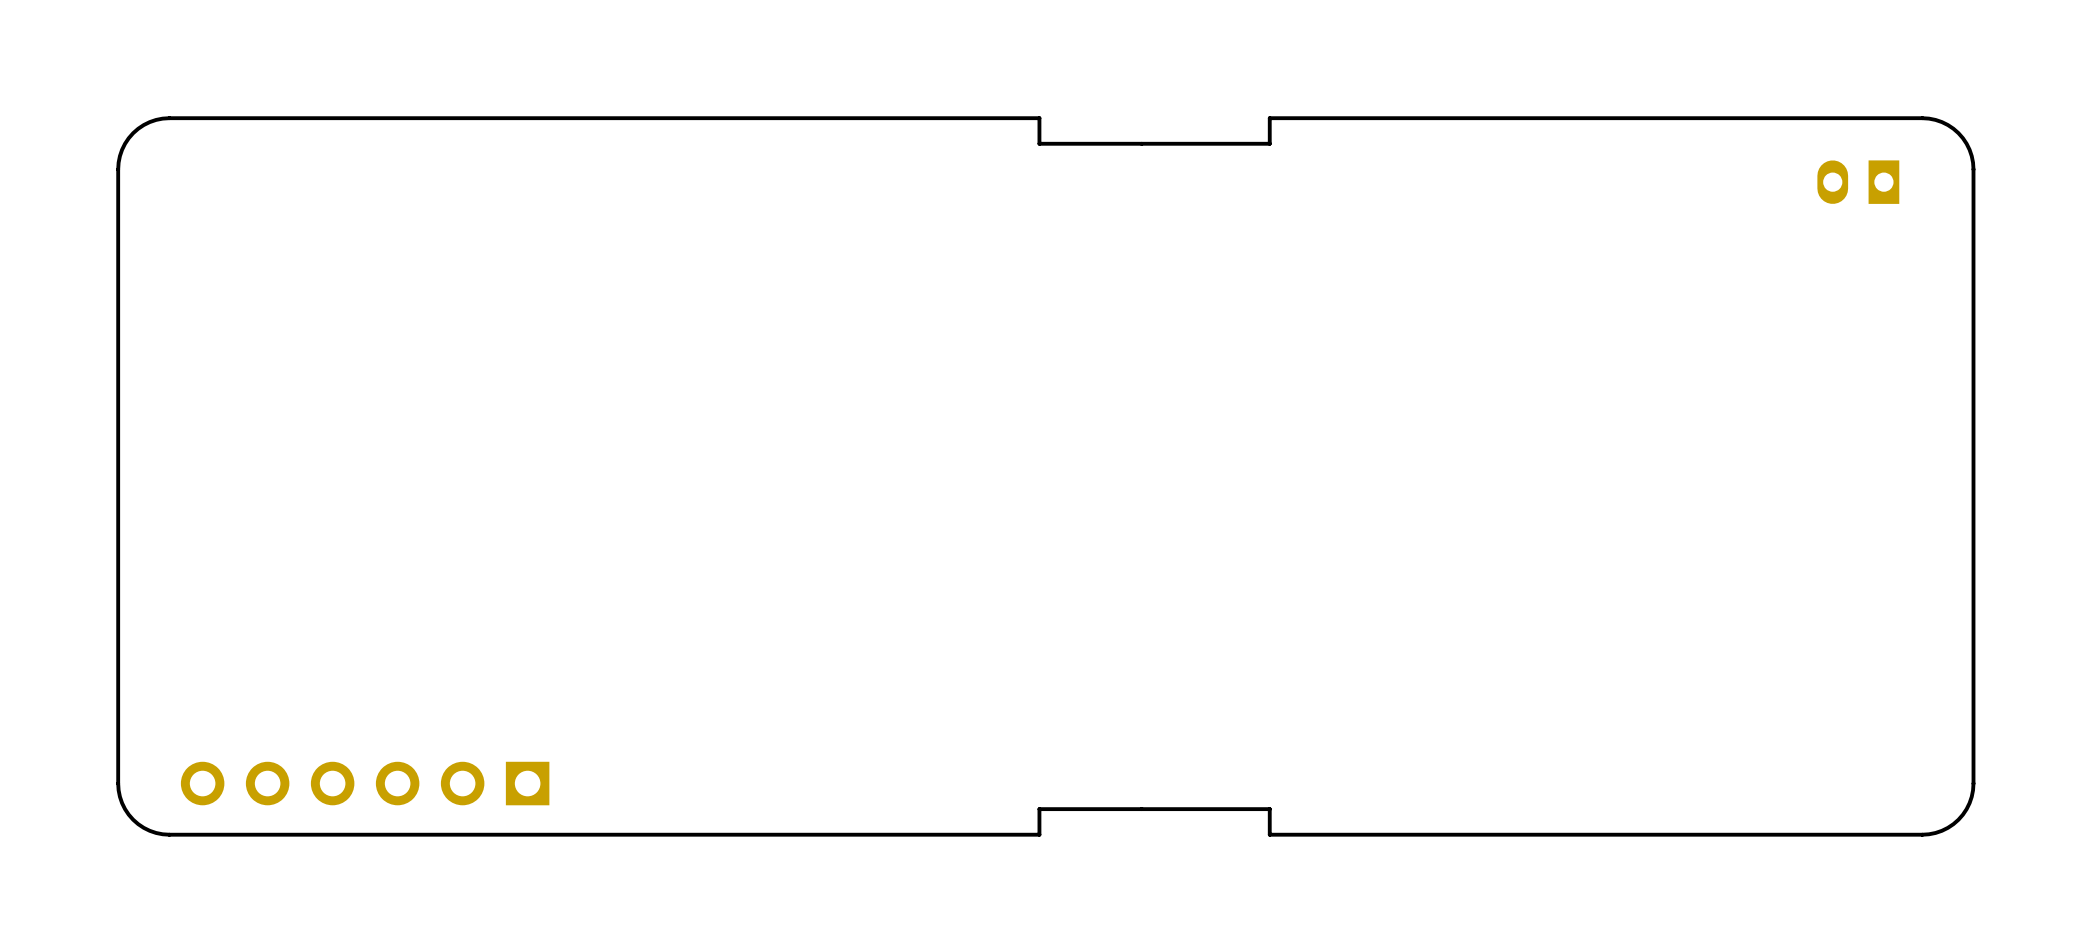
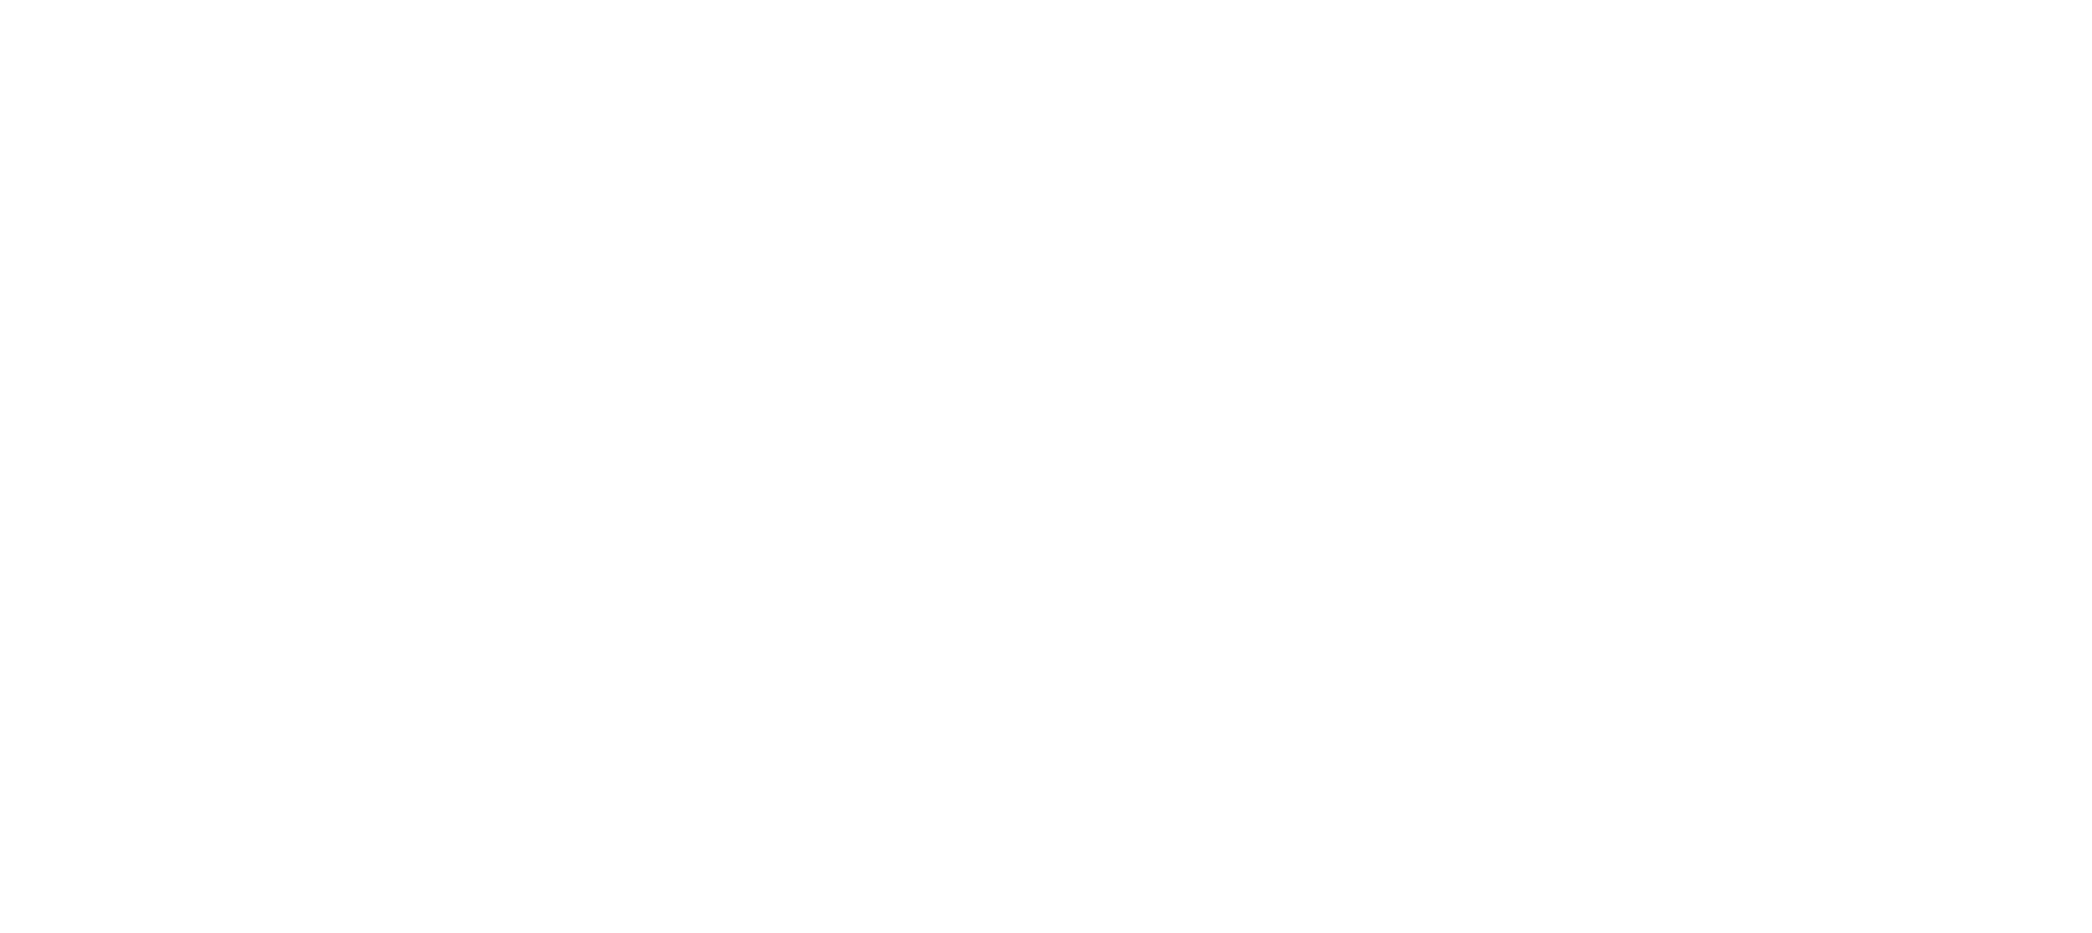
board edge: (1922, 118) (1269, 118) (1269, 143) (1039, 143) (1039, 118) (169, 118) (149, 122) (138, 128) (128, 138) (122, 149) (118, 169) (118, 783) (122, 803) (133, 819) (143, 827) (156, 832) (169, 834) (1039, 834) (1039, 809) (1269, 809) (1269, 834) (1922, 834) (1941, 830) (1953, 824) (1966, 809) (1971, 796) (1973, 783) (1973, 169) (1969, 149) (1958, 133) (1941, 122) (1922, 118) -> none
part: (1858, 182) -> none
part: (365, 783) -> none

